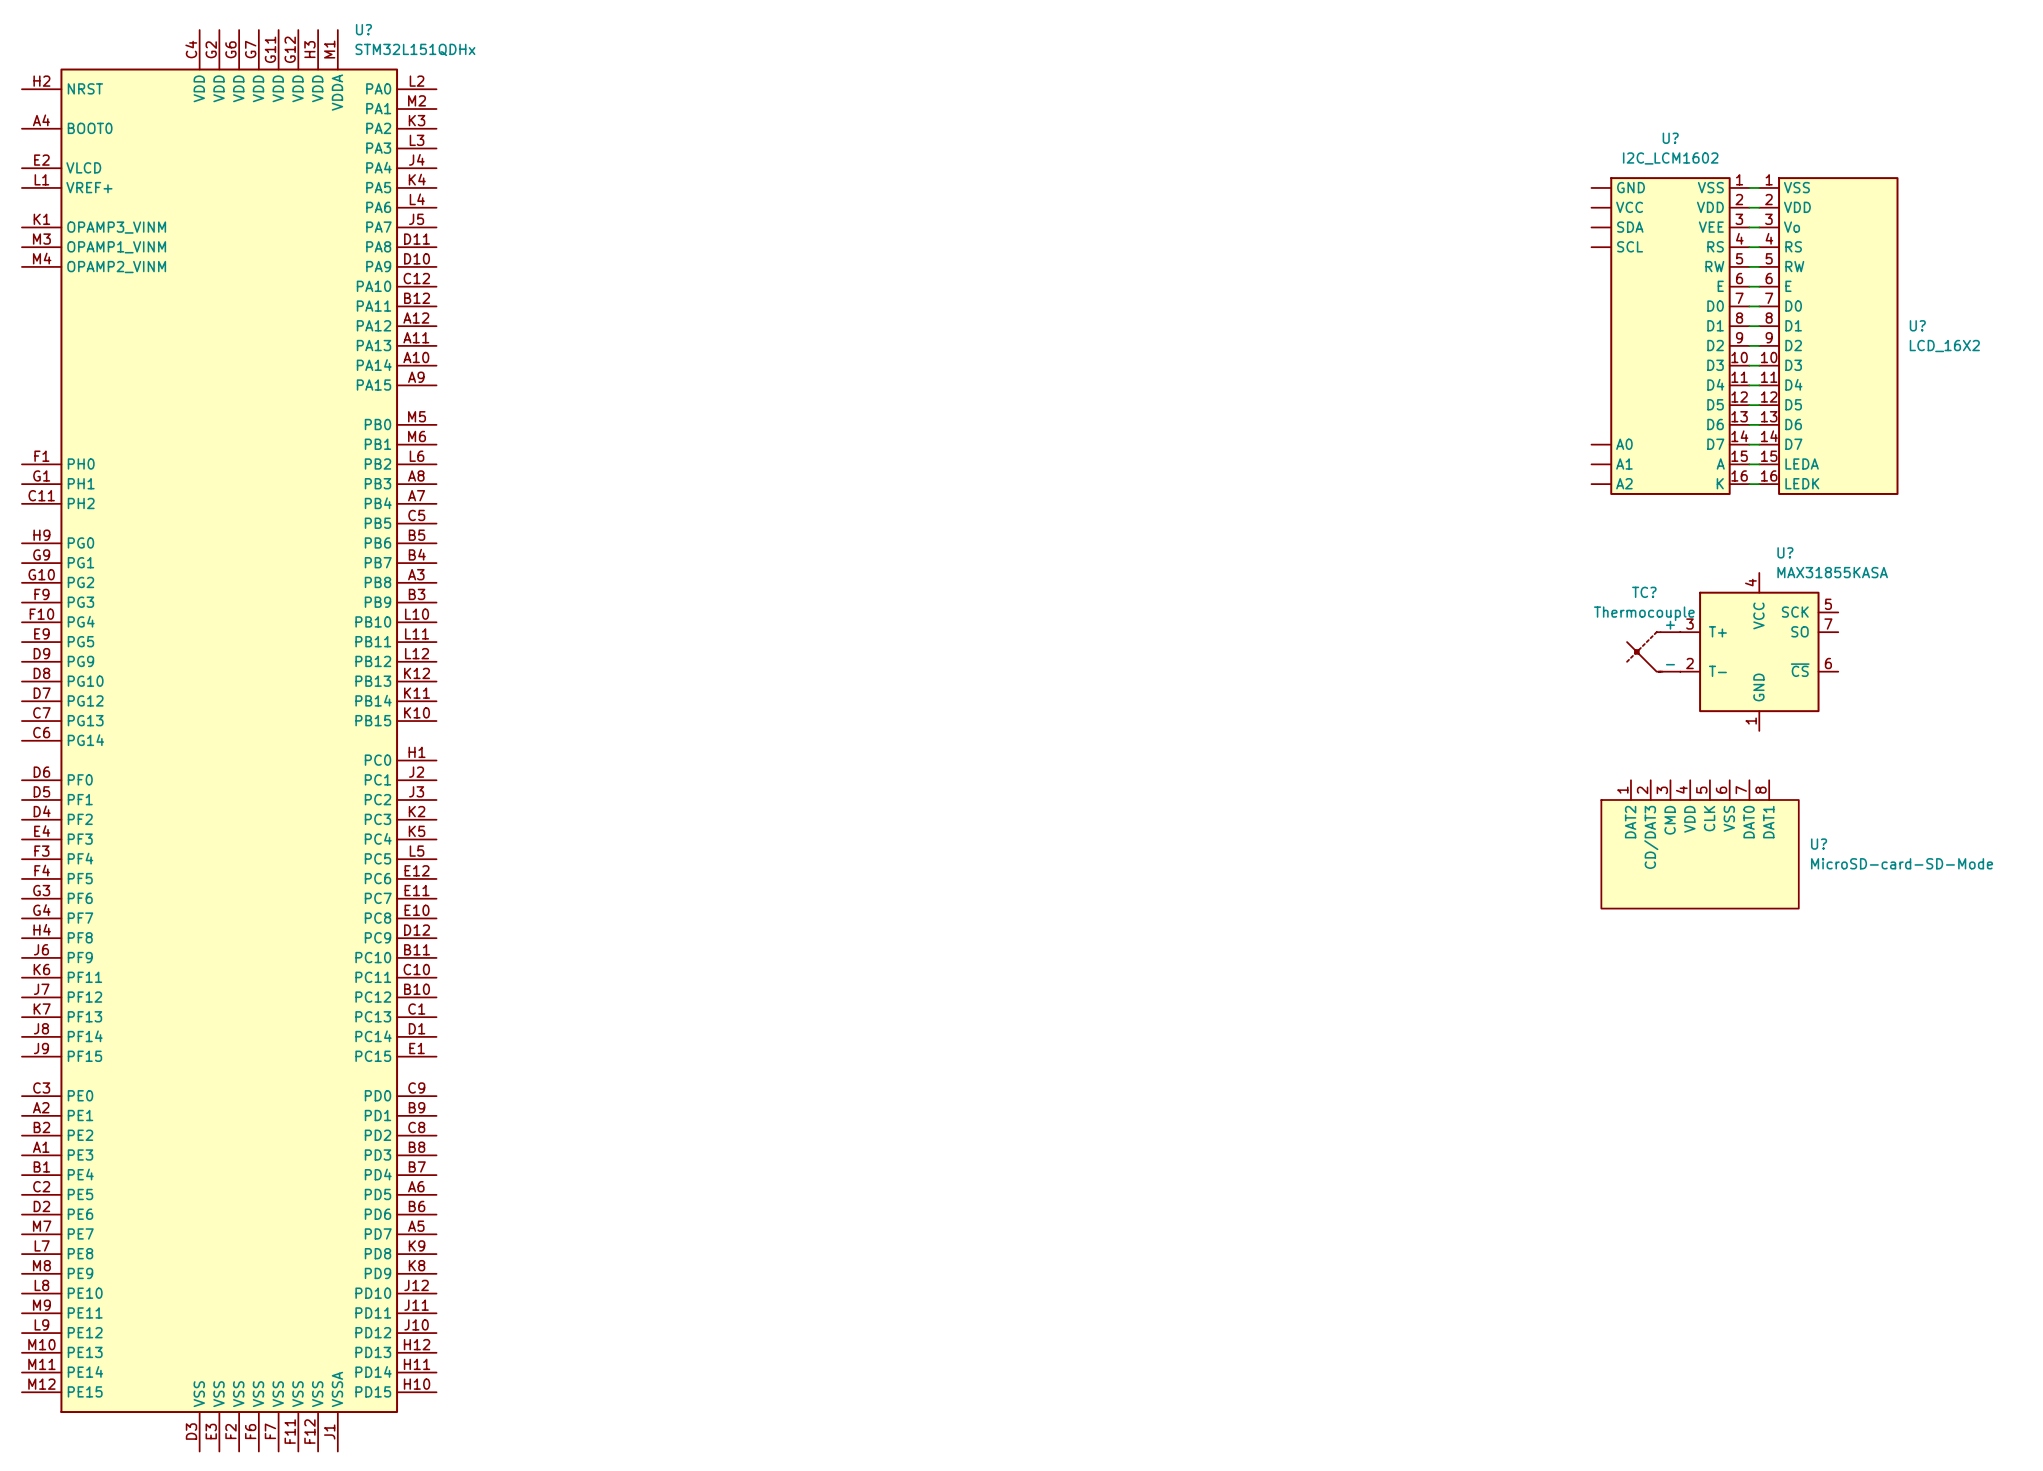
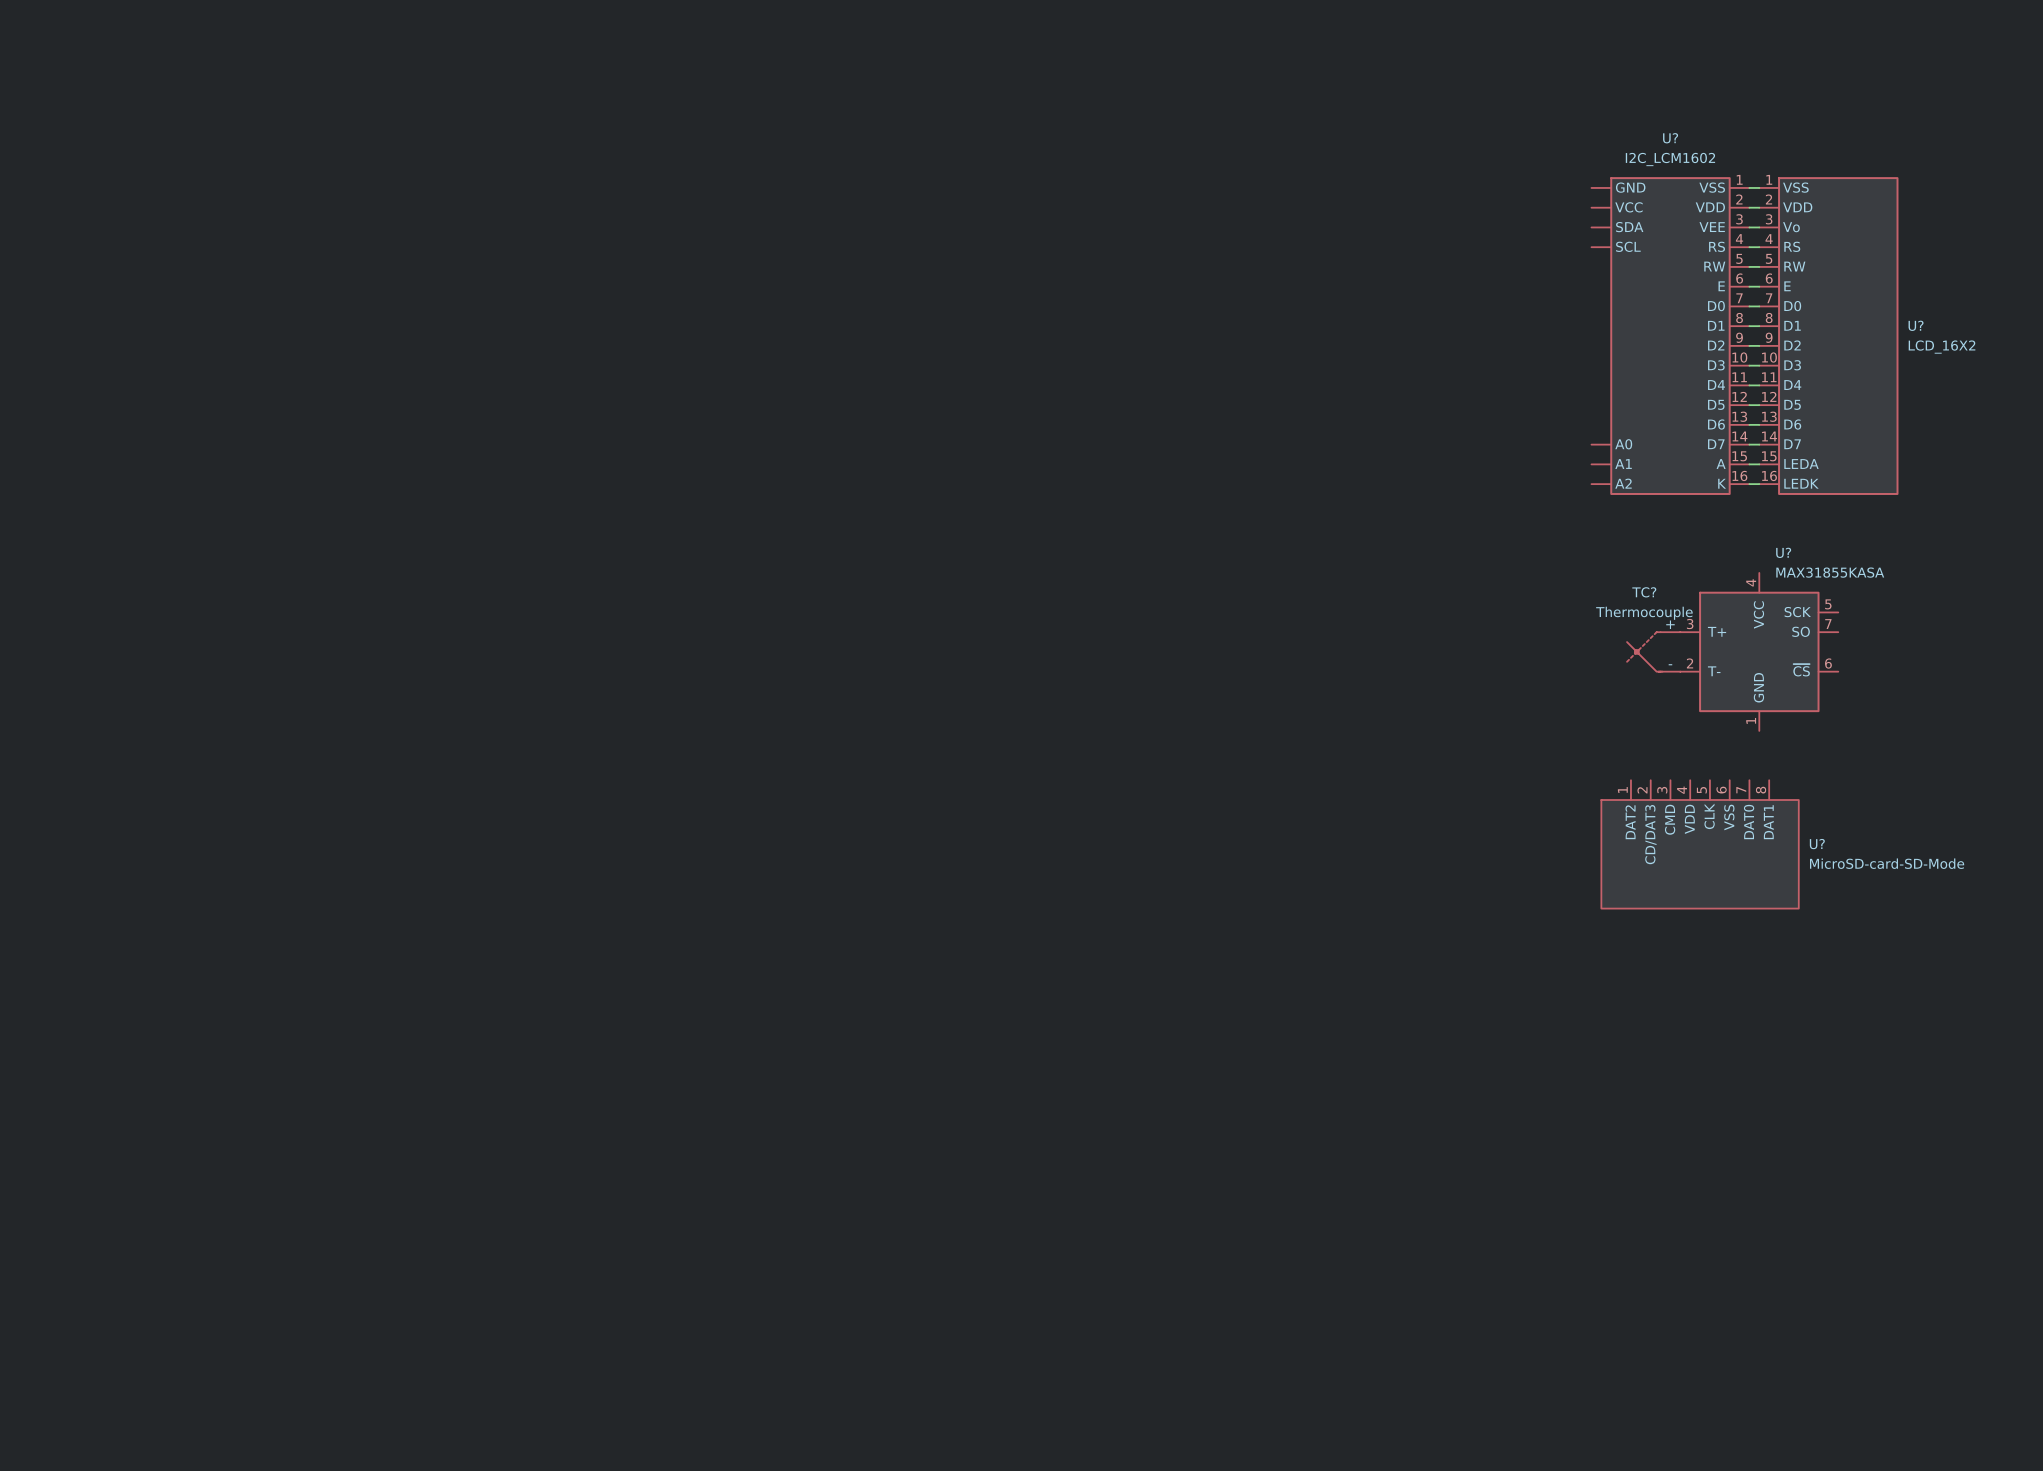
U?: STM32L151QDHx (229, 740) -> none

